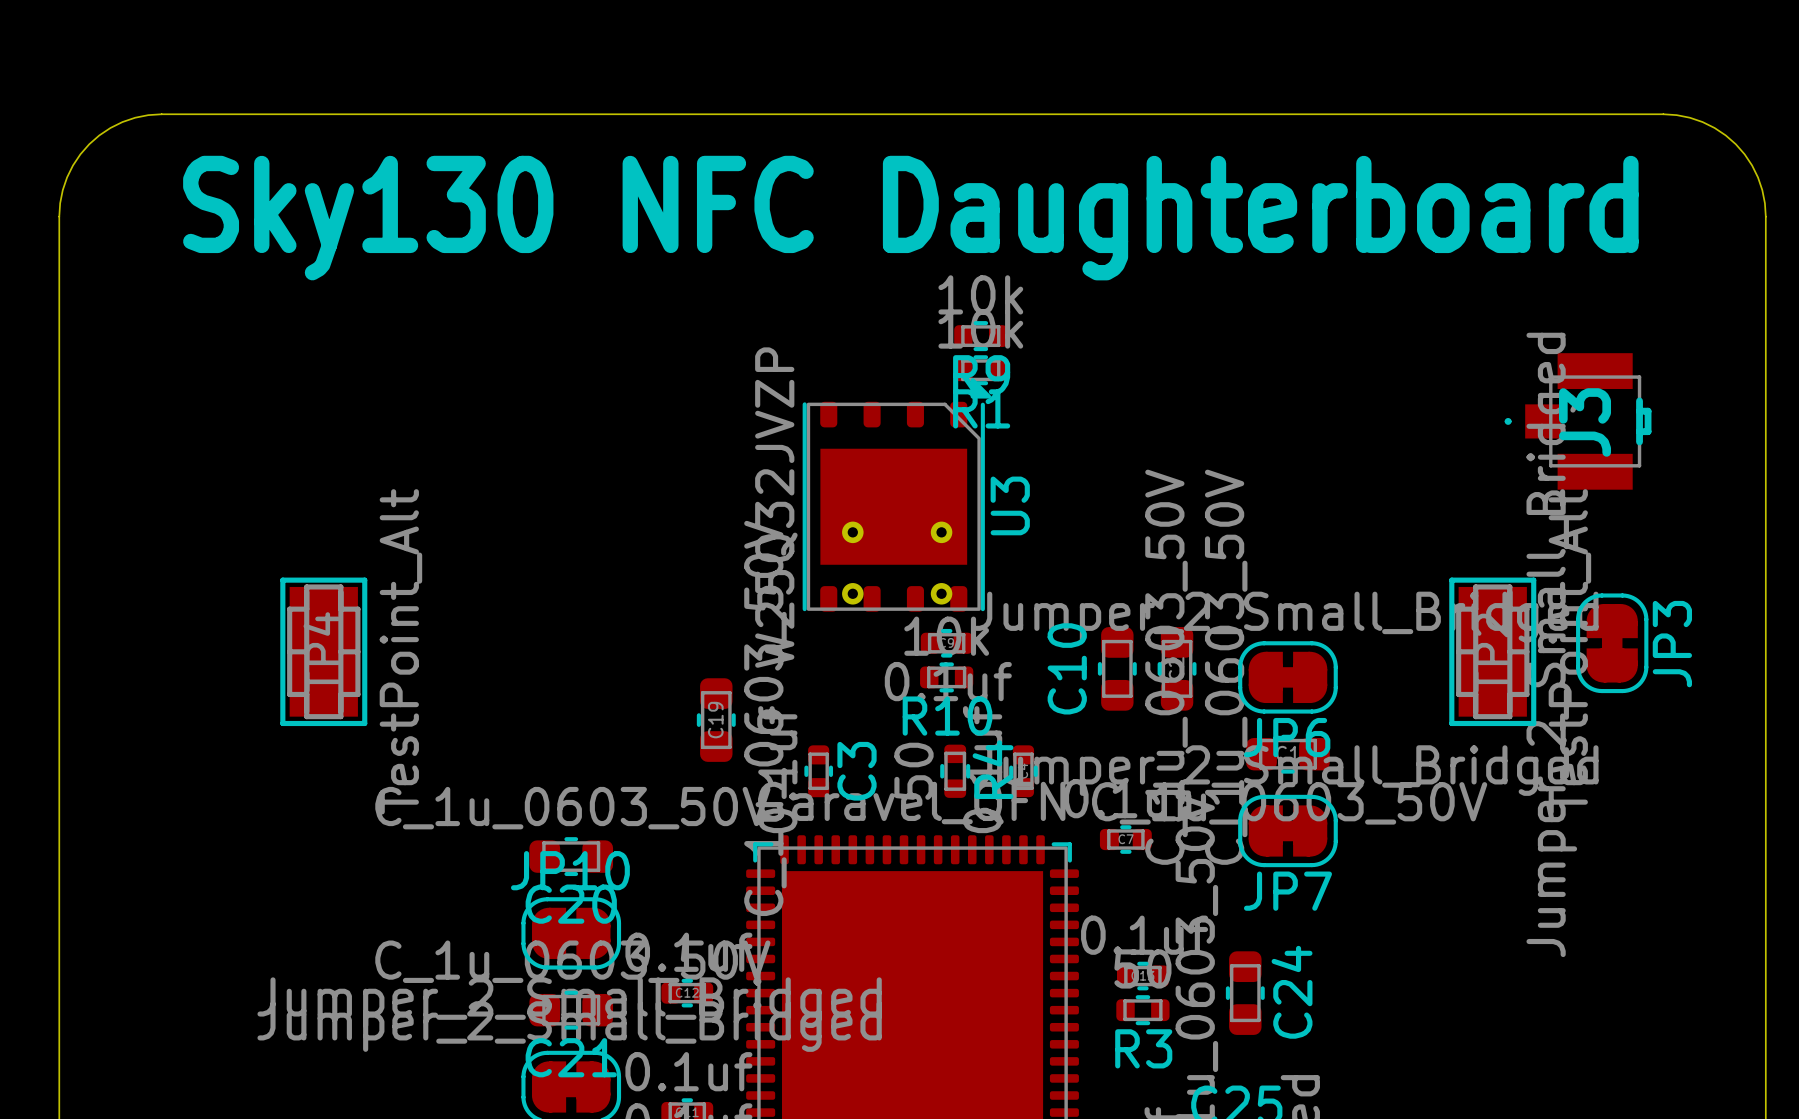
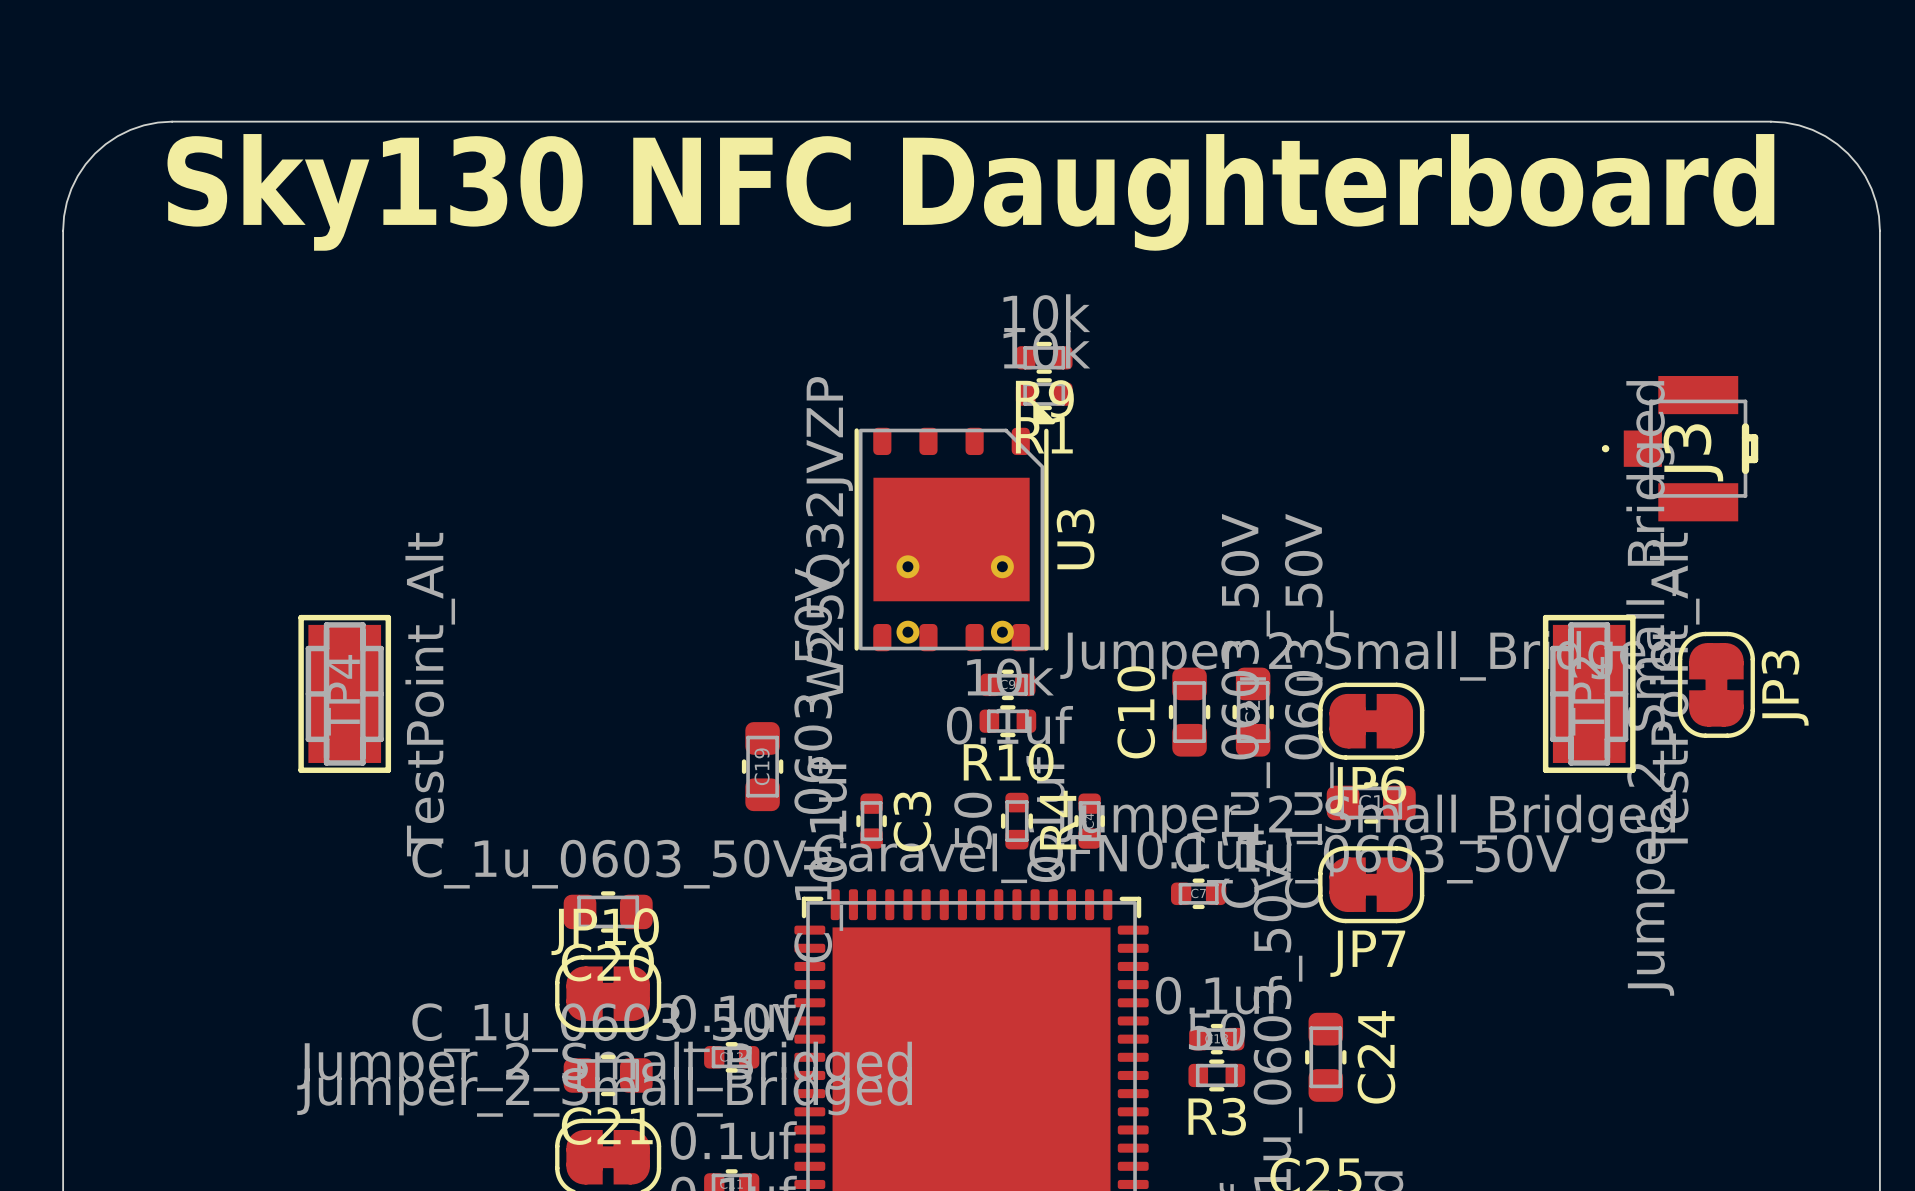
text position: Sky130 NFC Daughterboard (910, 218) -> Sky130 NFC Daughterboard (970, 192)

